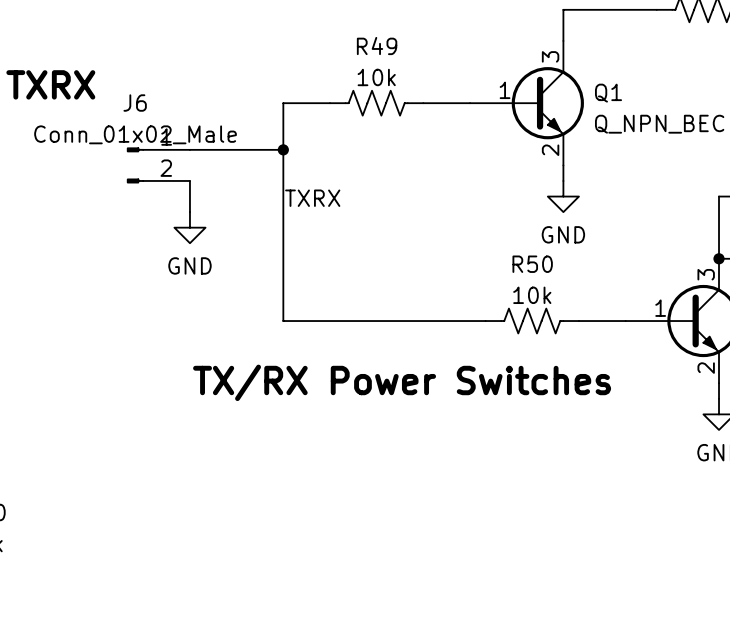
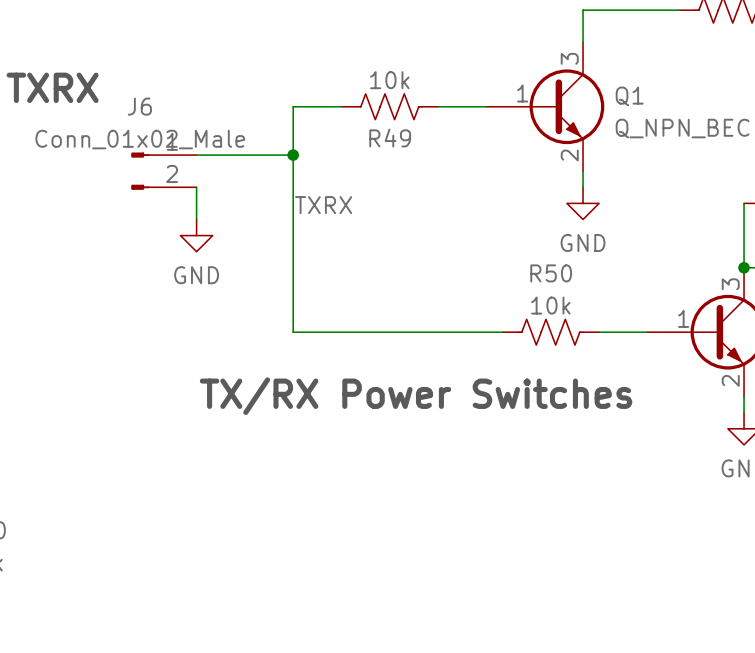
R49 name position: R49 (377, 46) -> R49 (390, 137)

